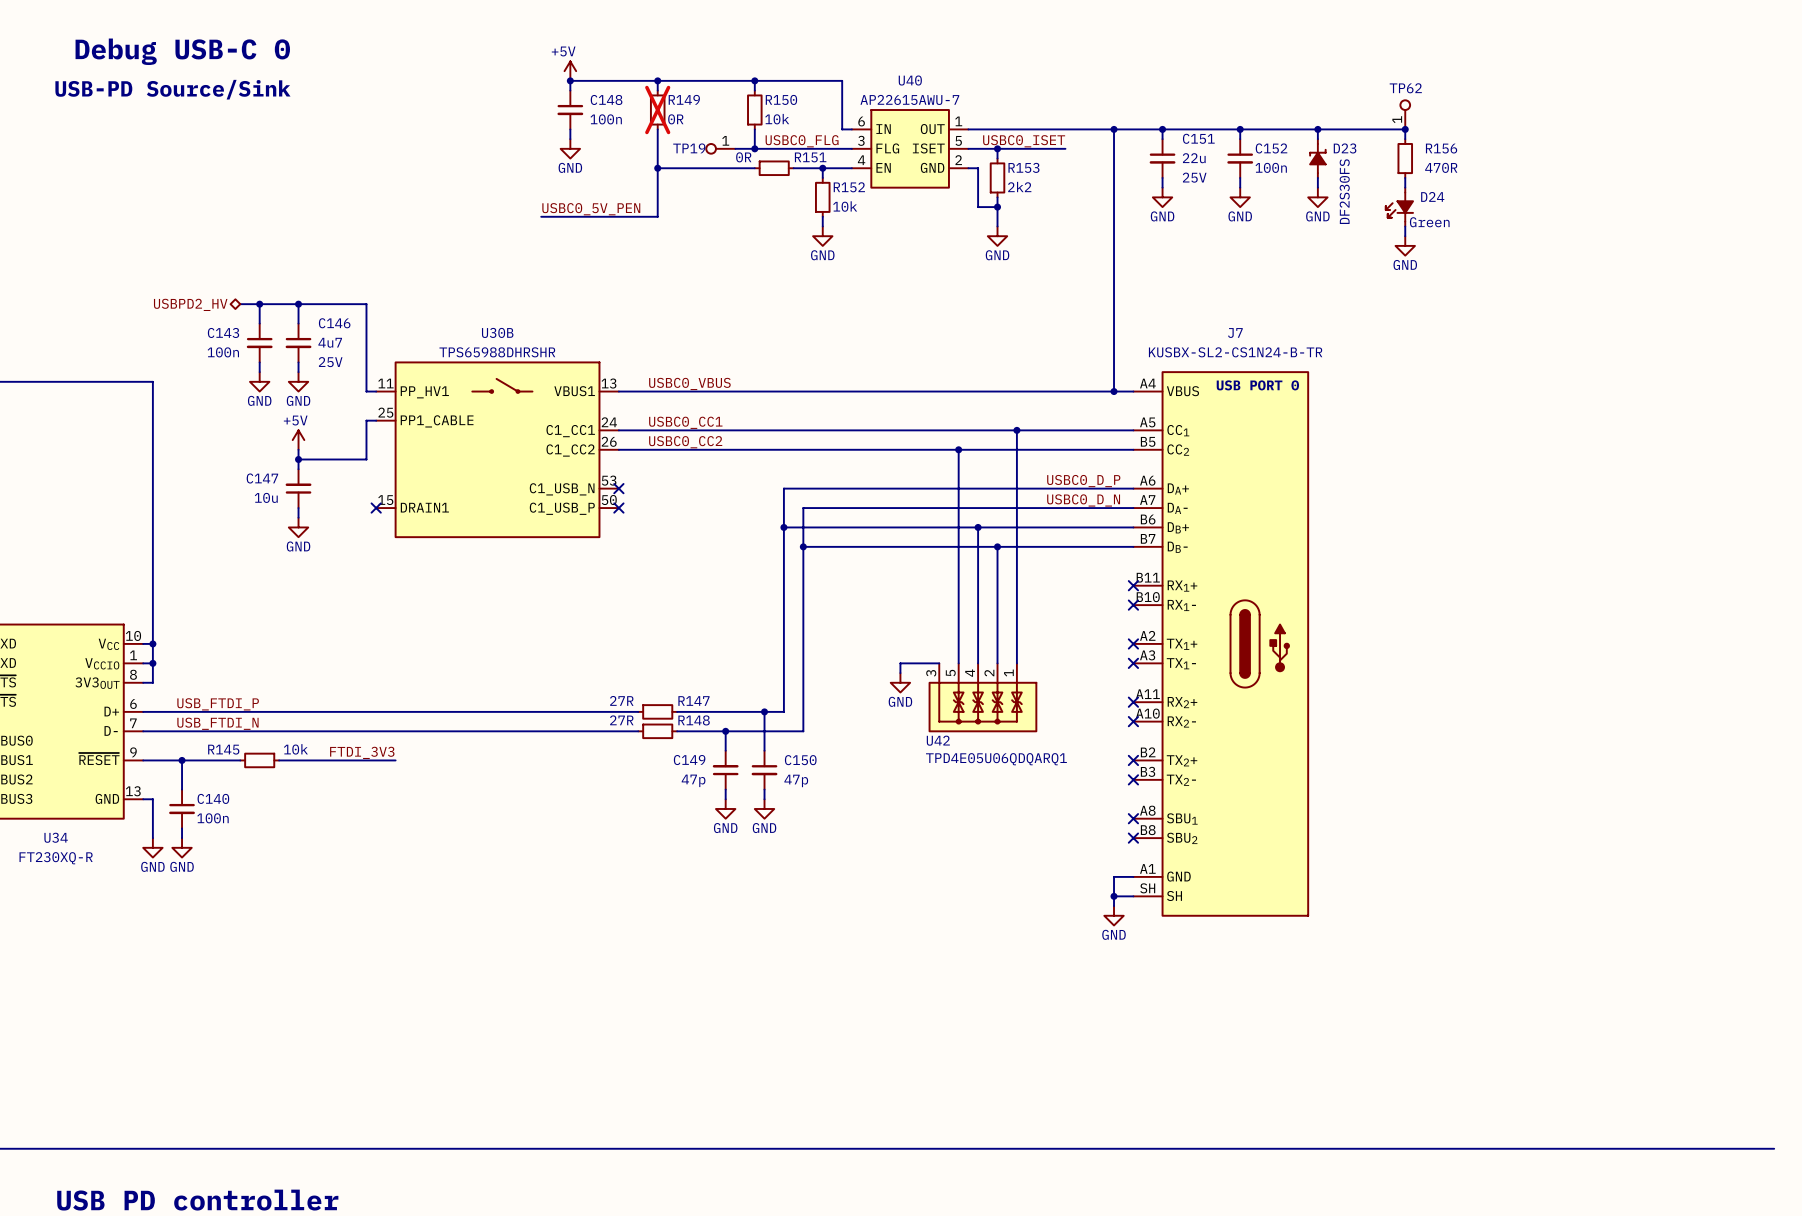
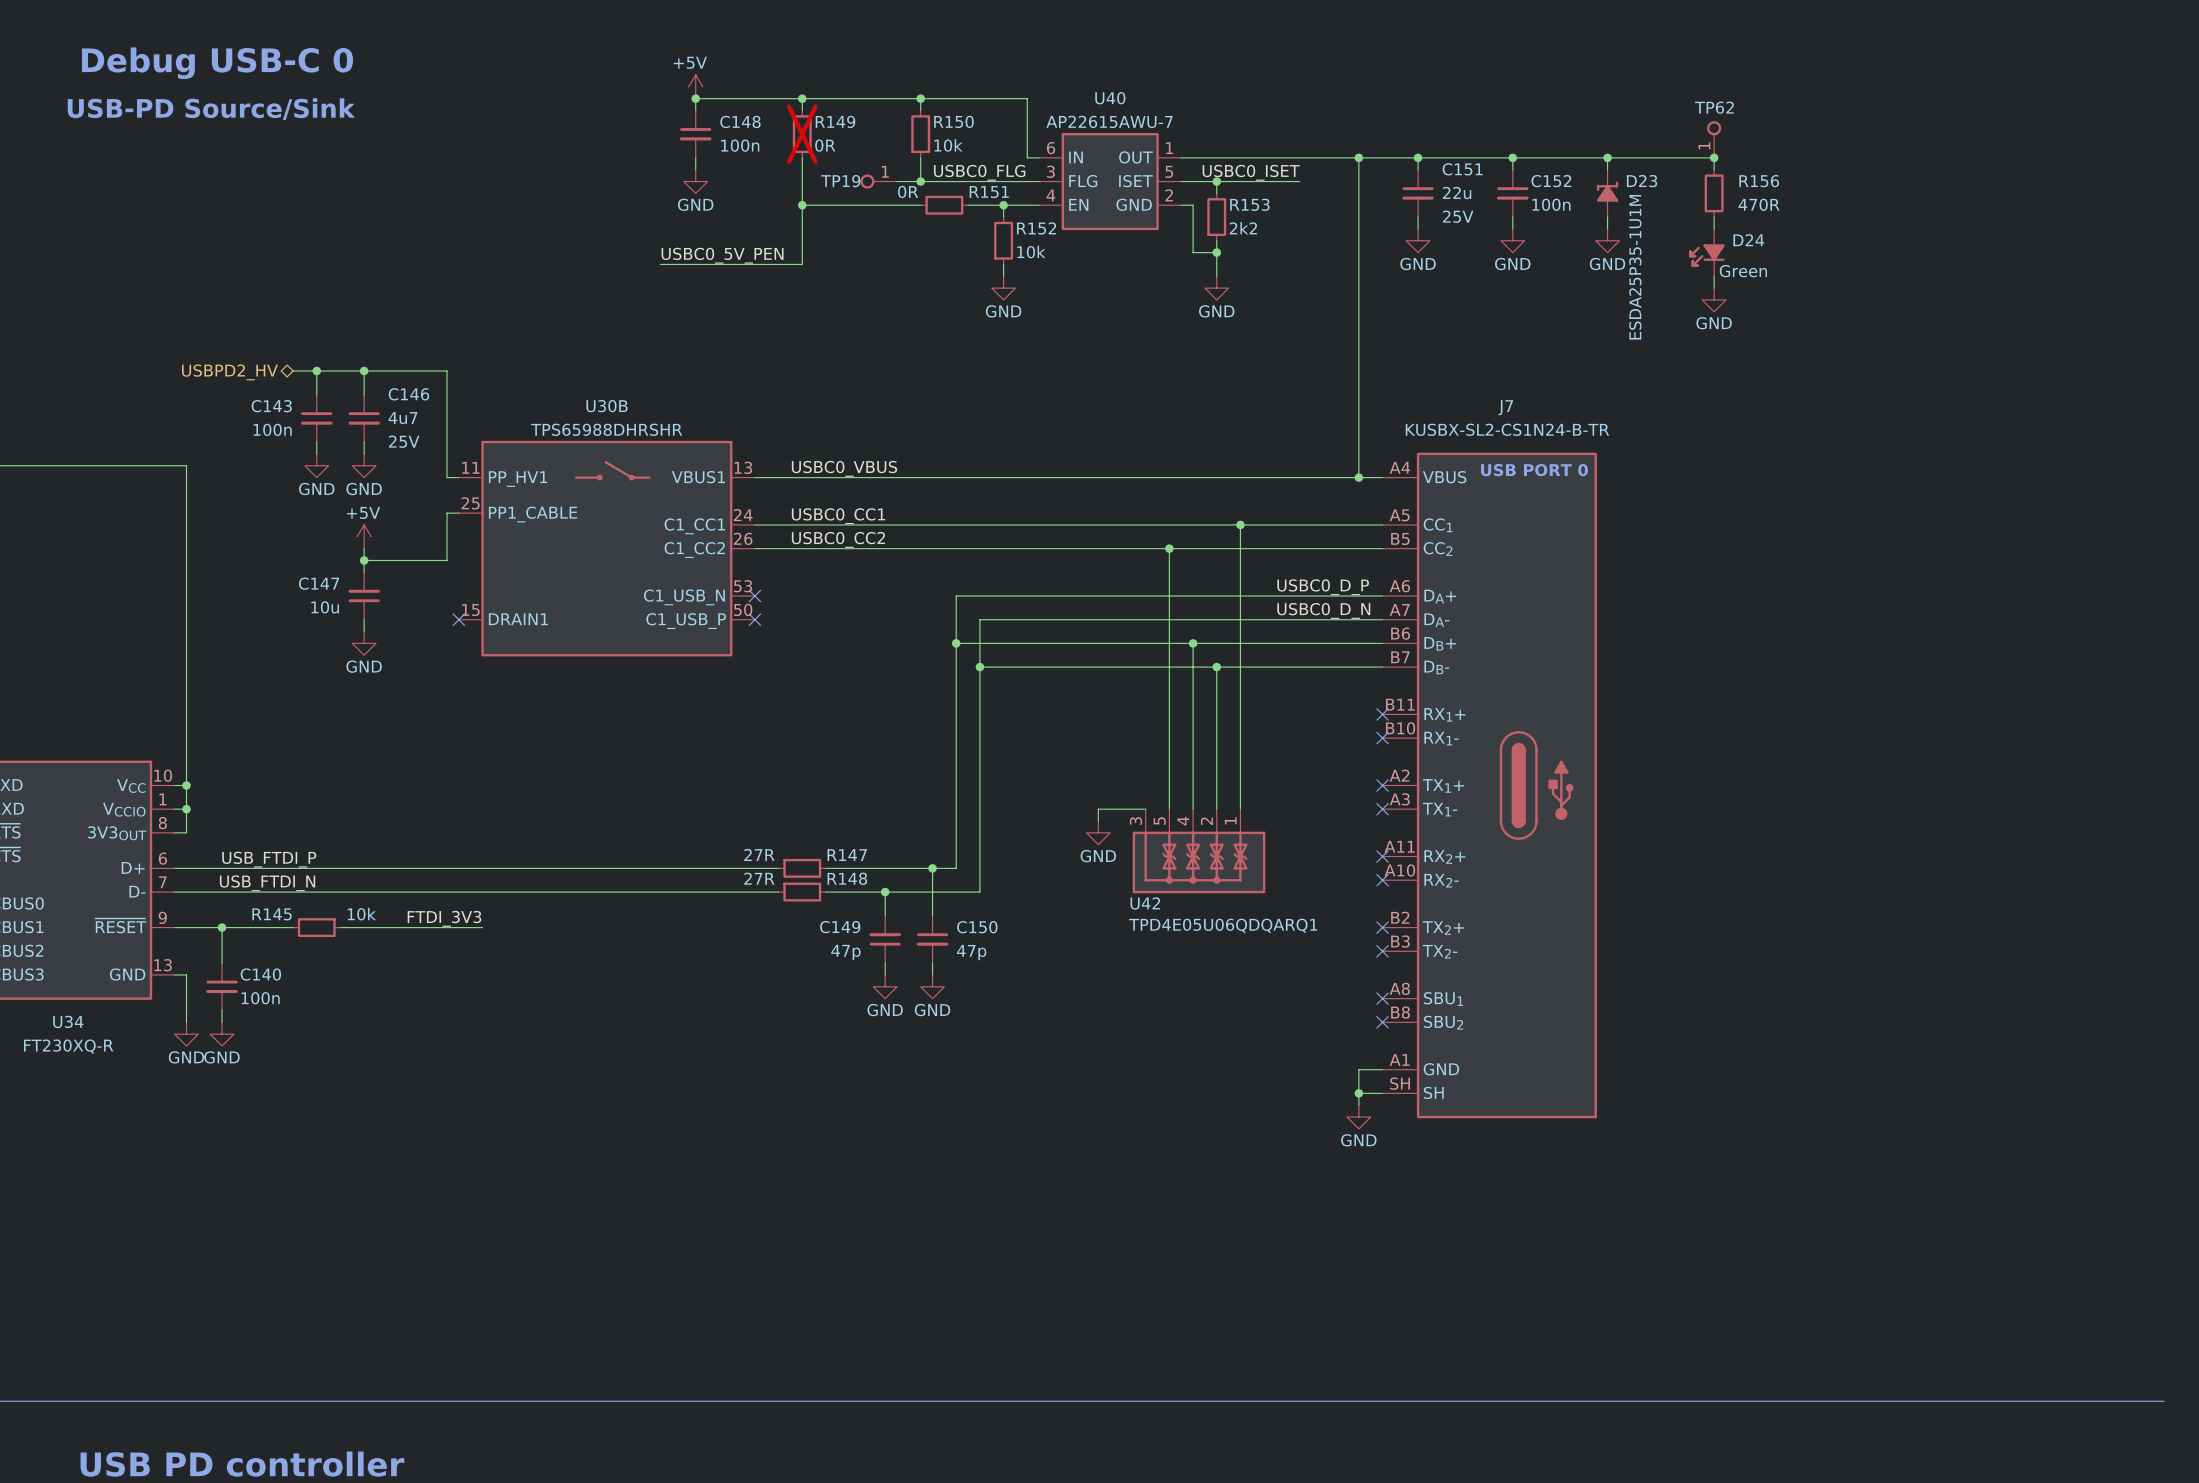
D23 text: DF2S30FS (1344, 191) -> ESDA25P35-1U1M (1635, 267)

